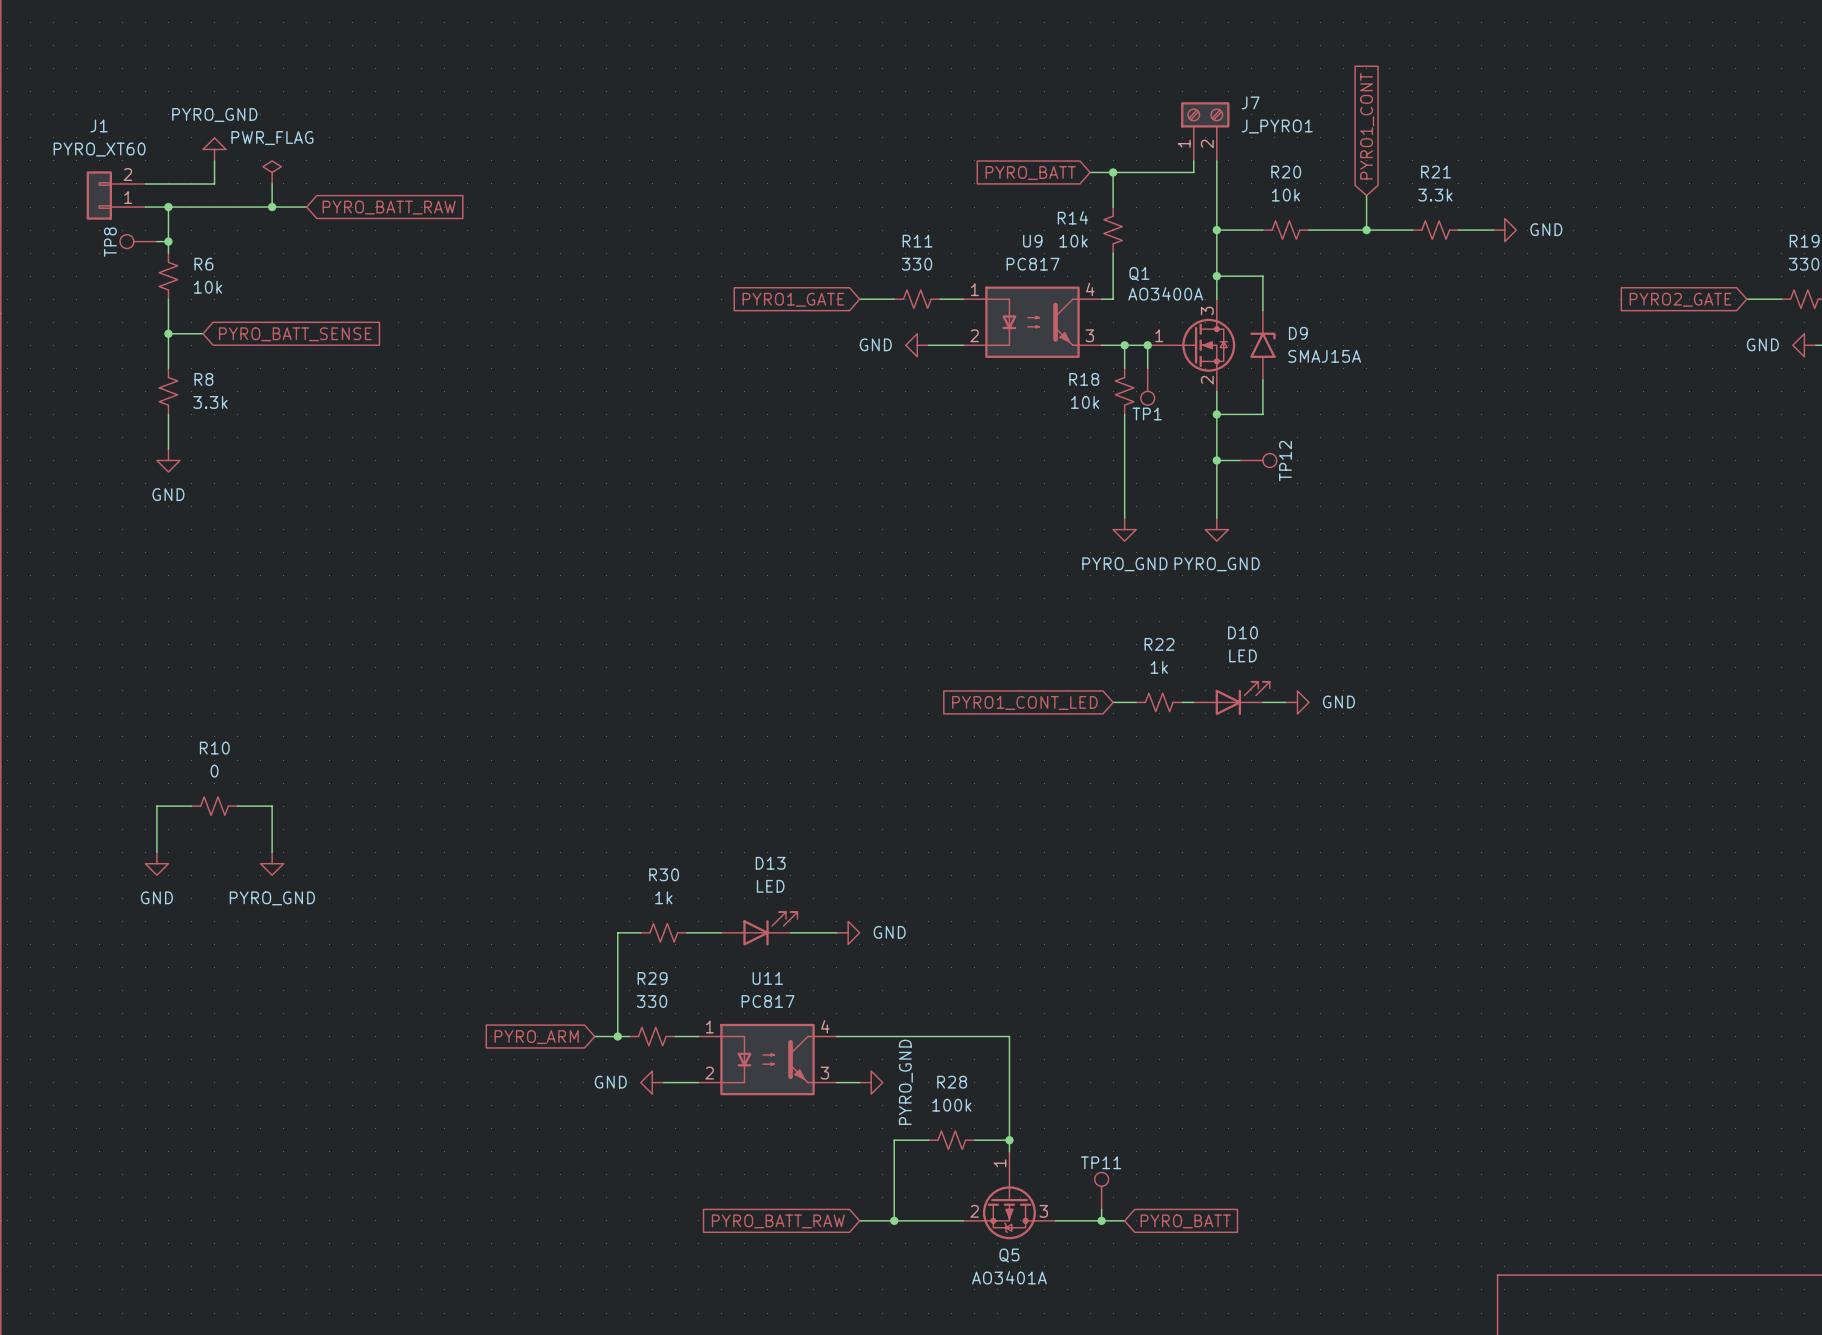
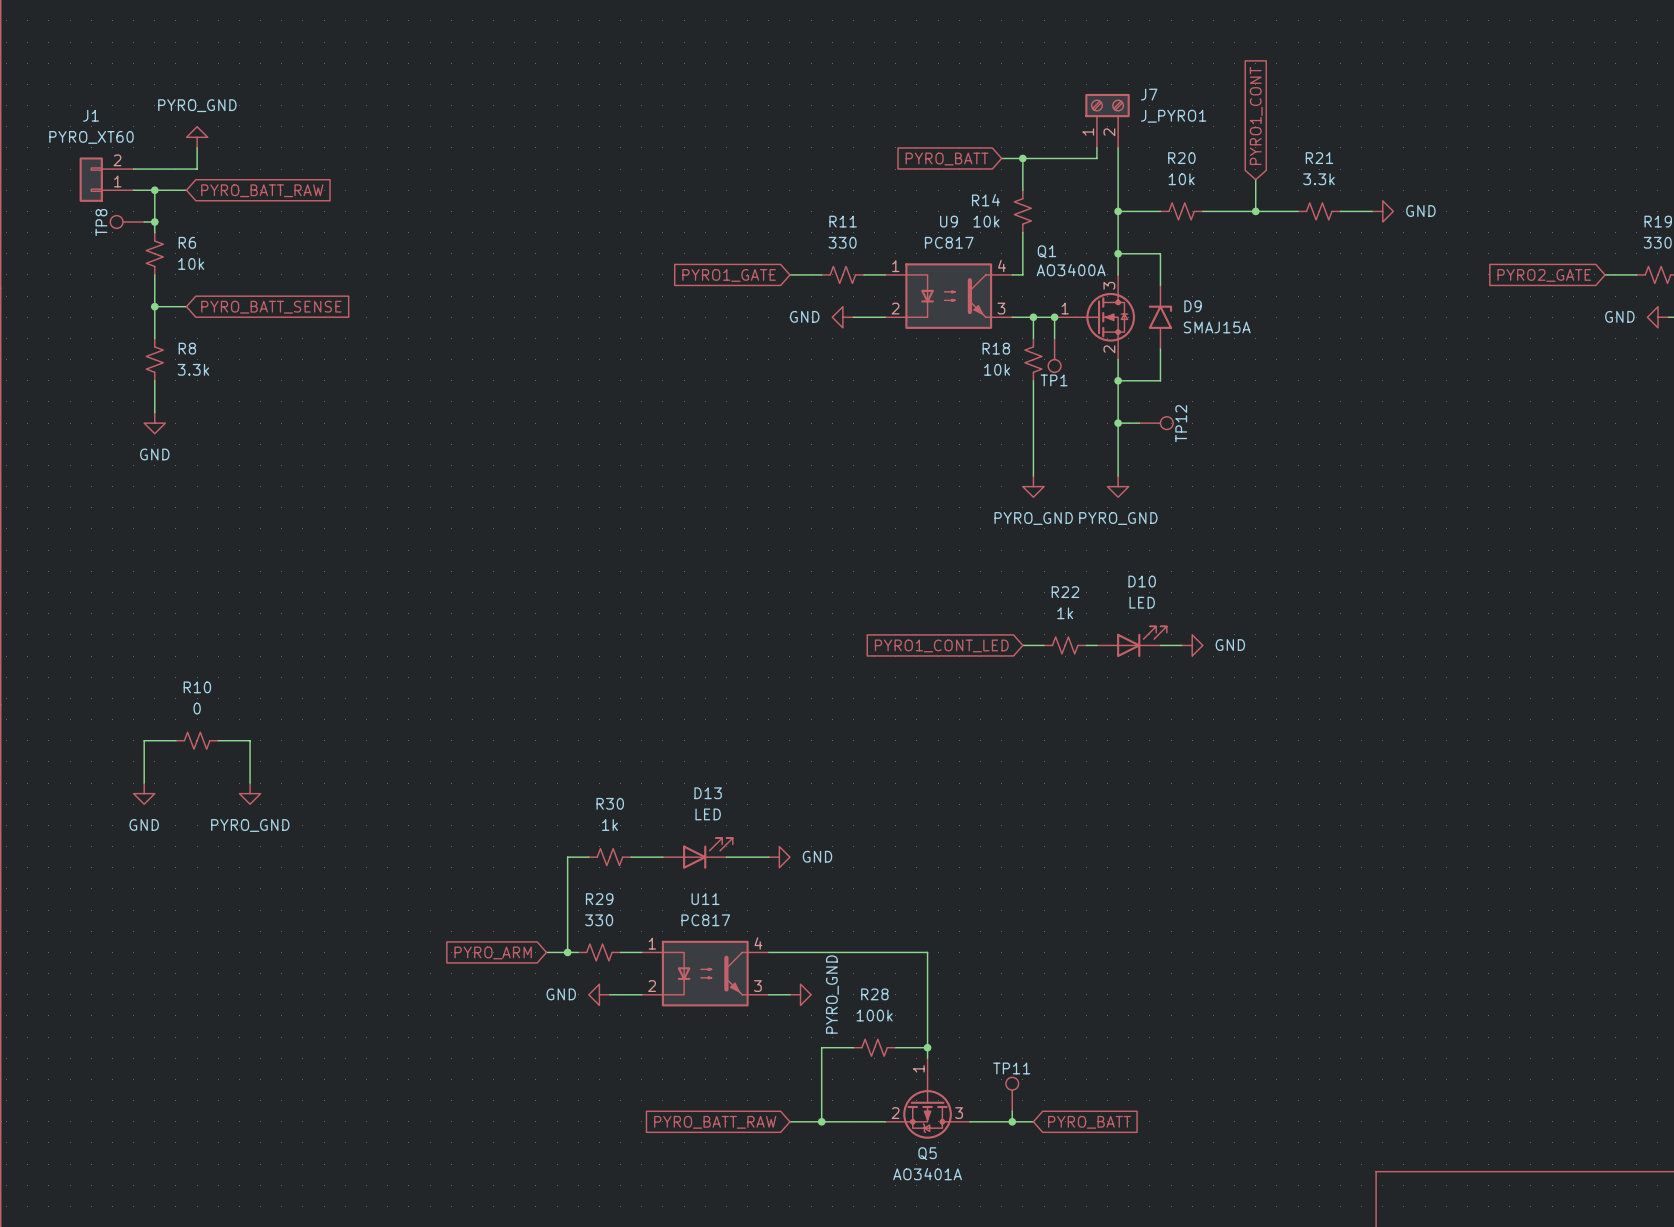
power symbol: PWR_FLAG (272, 172) -> none
wire: (272, 183) (272, 207) -> none
wire: (203, 207) (306, 207) -> none
junction: (272, 207) -> none
global label position: PYRO_BATT_RAW (389, 207) -> PYRO_BATT_RAW (262, 190)

